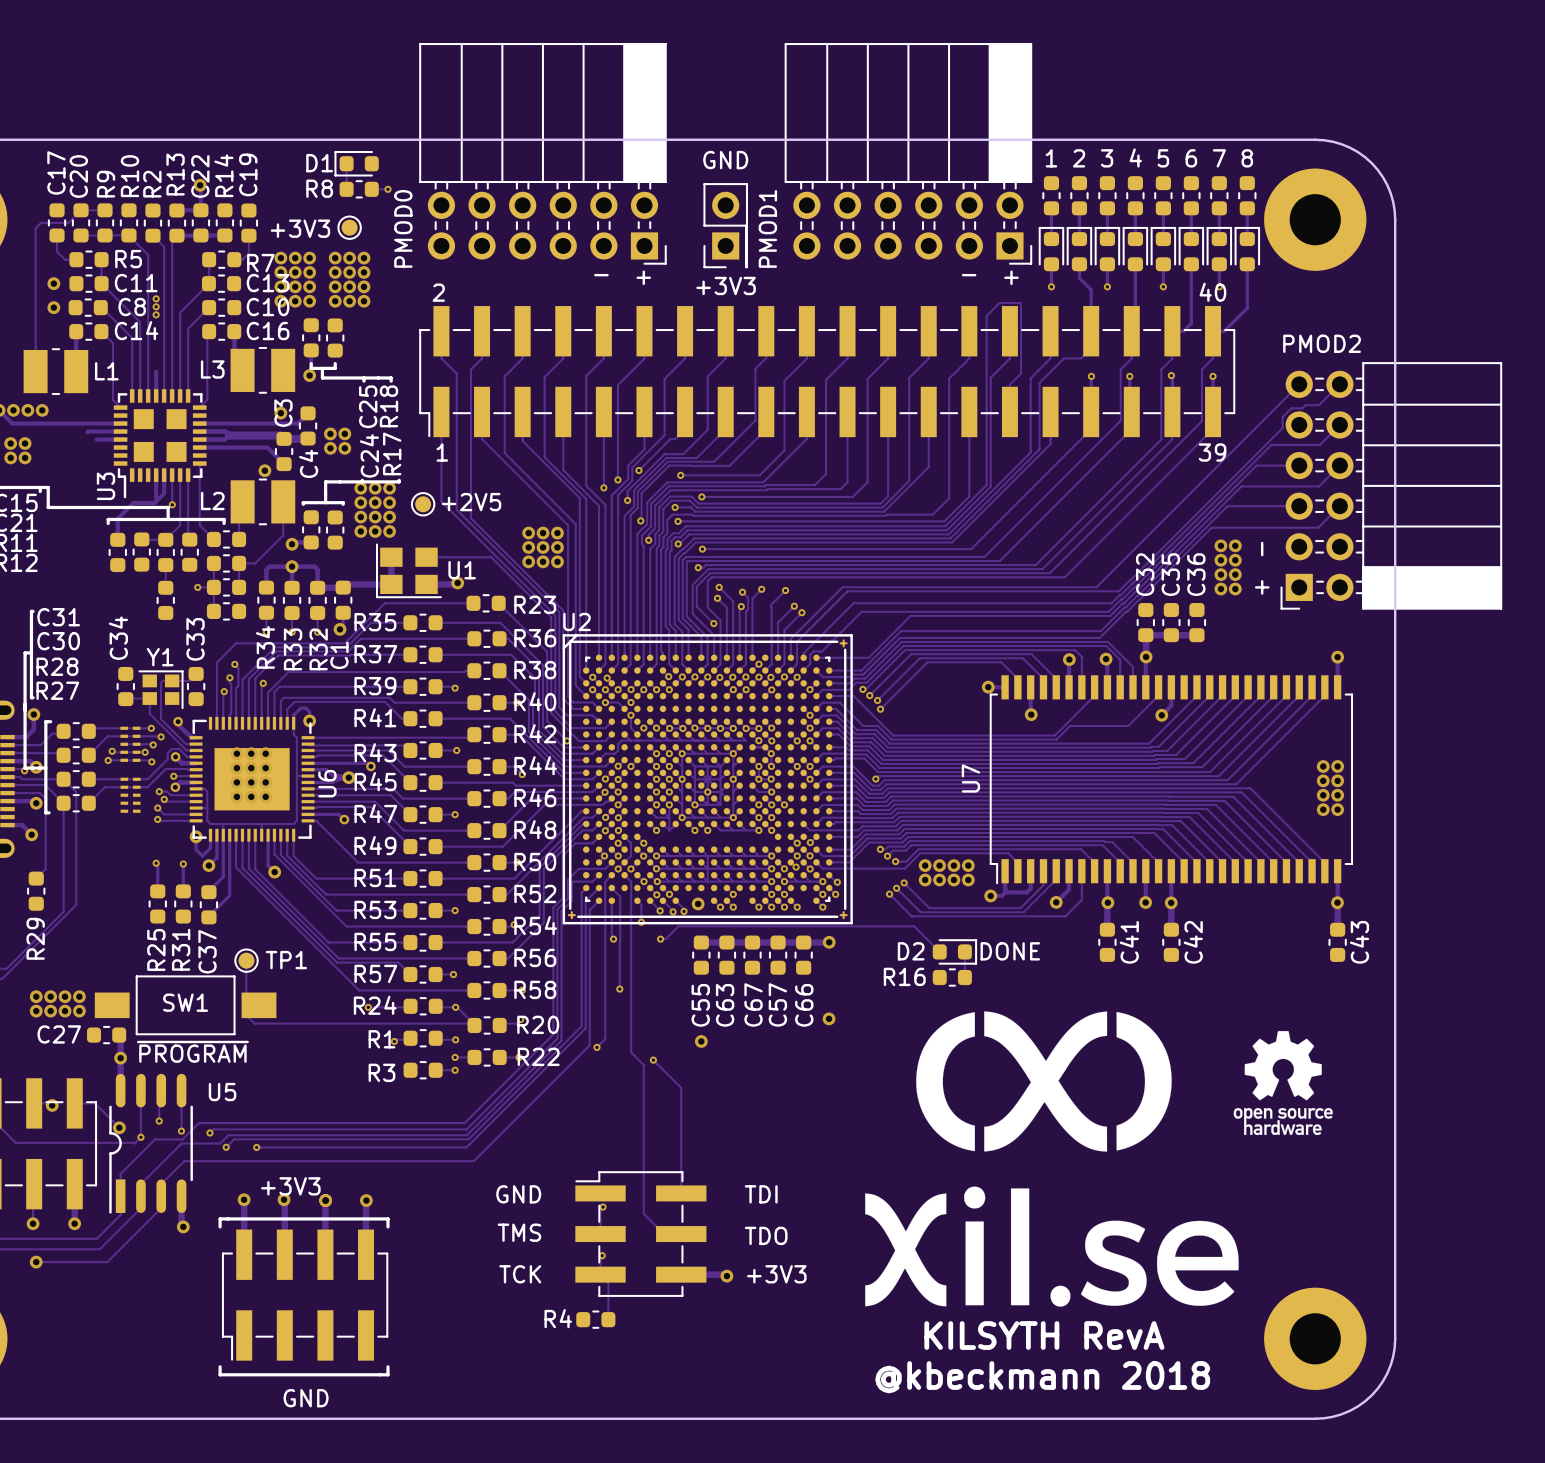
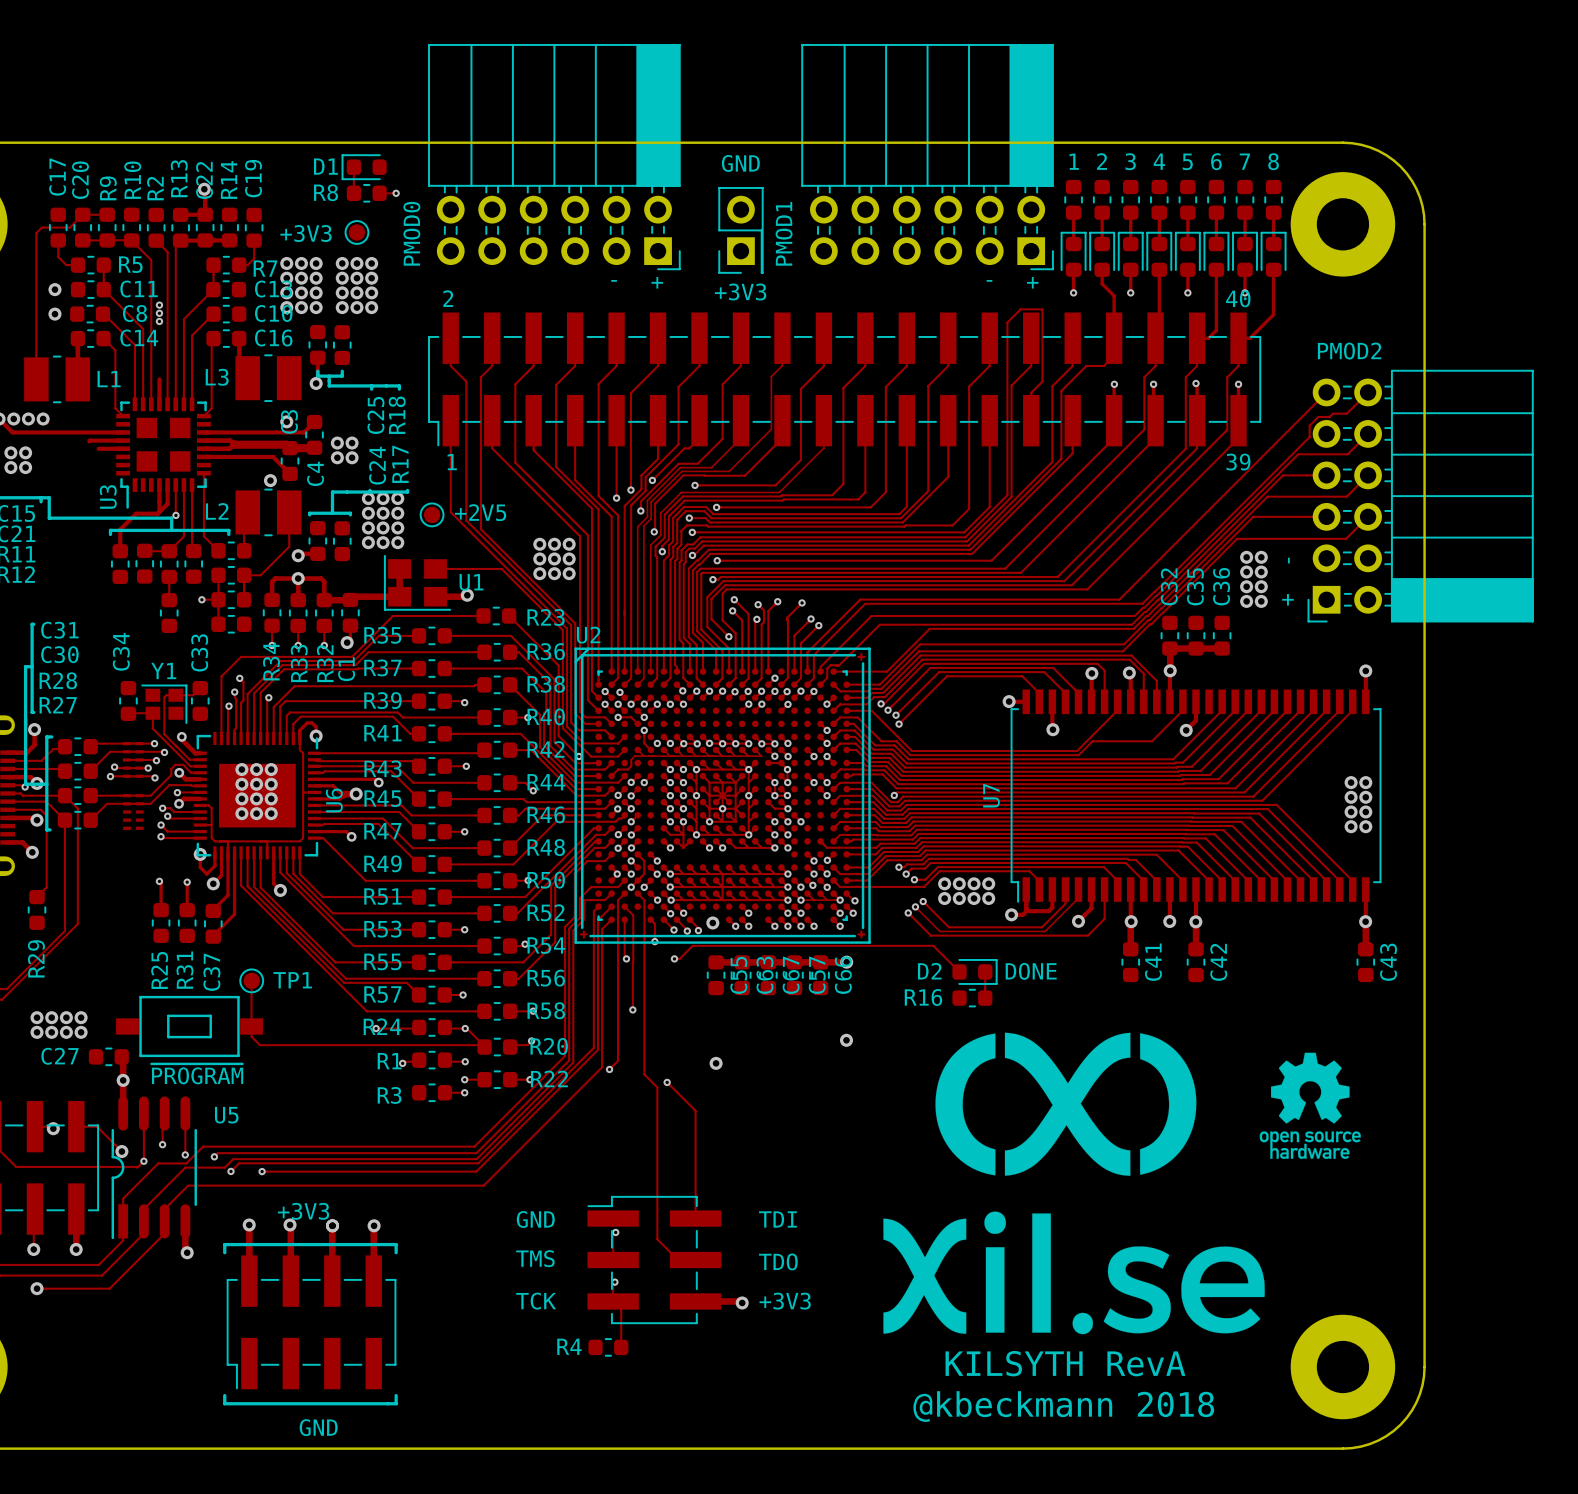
C67 name position: C67 (753, 1004) -> C67 (791, 975)
C57 name position: C57 (777, 1004) -> C57 (817, 975)
SW1: (185, 1005) -> none
part: none -> (189, 1026)
C55 name position: C55 (700, 1005) -> C55 (738, 975)
C63 name position: C63 (725, 1005) -> C63 (764, 975)
C66 name position: C66 (804, 1005) -> C66 (843, 975)

